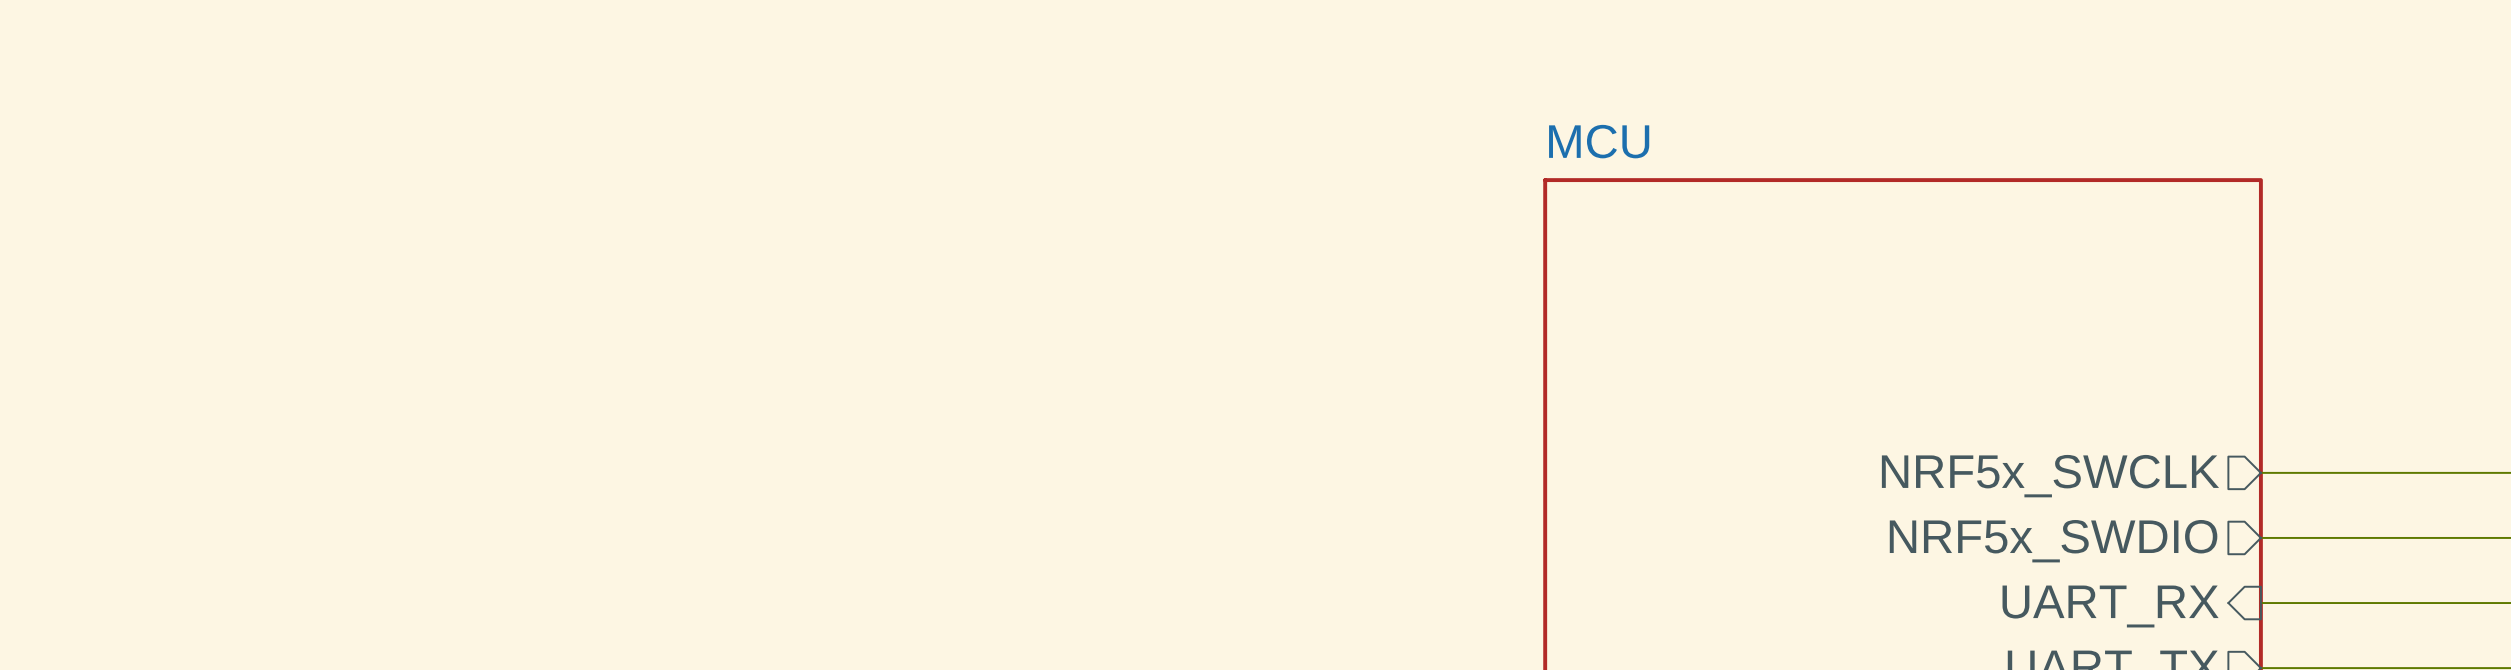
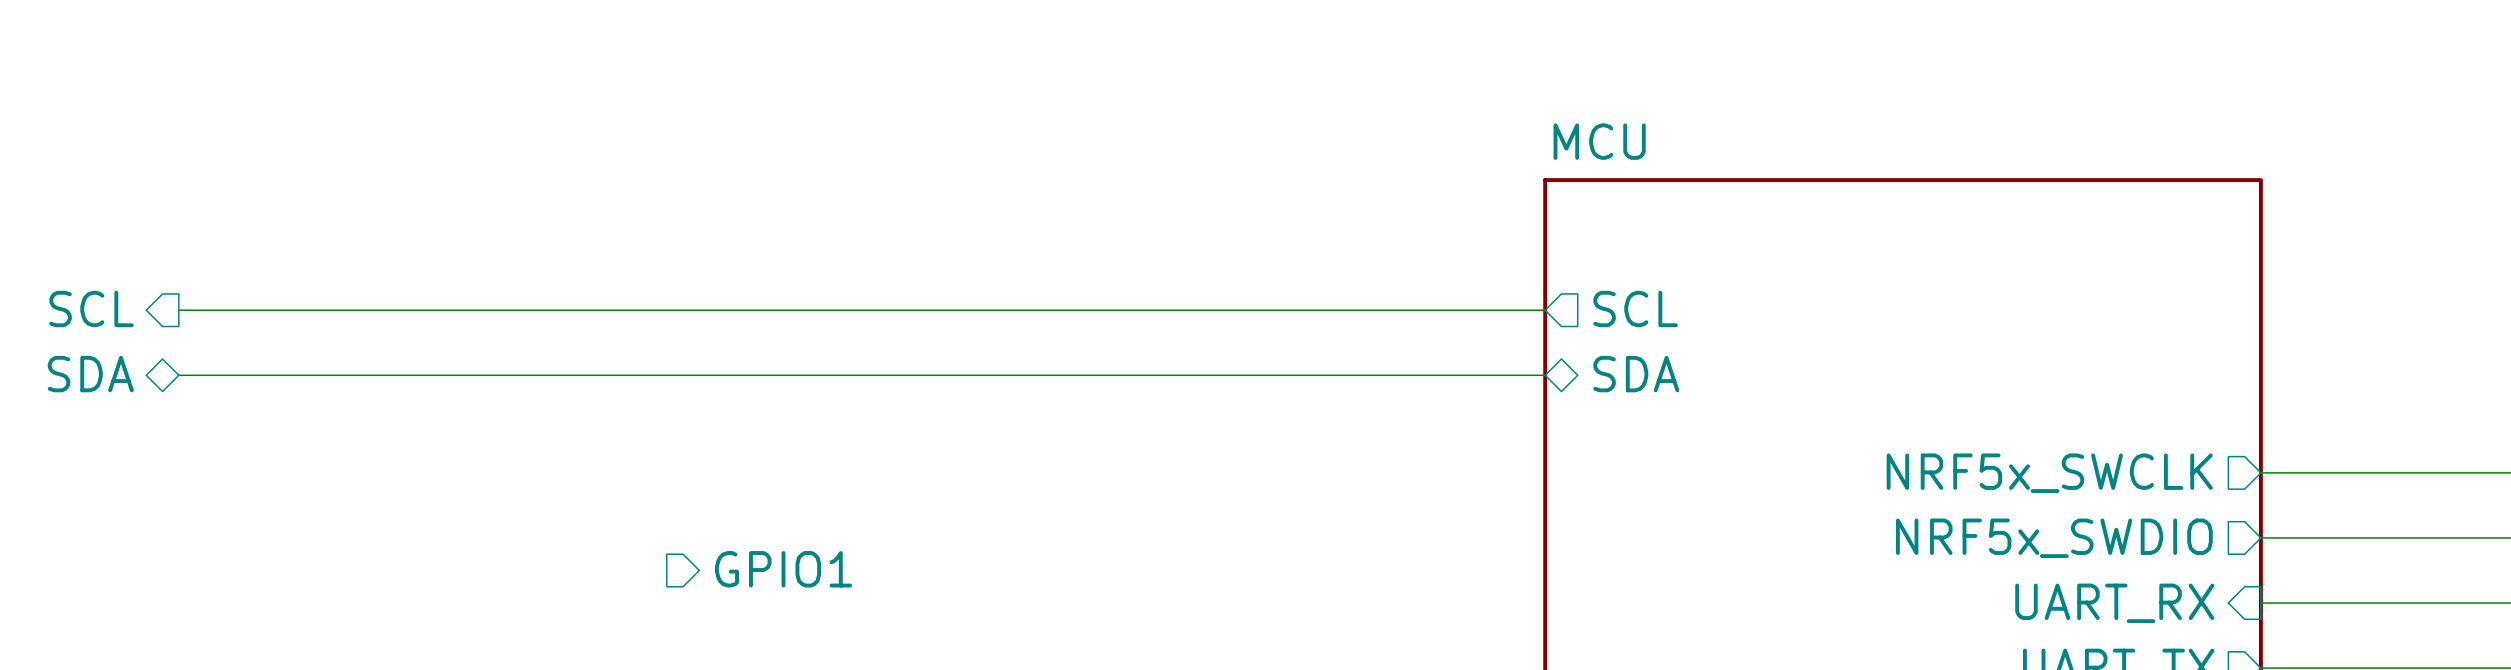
sheet pin: none -> SCL (91, 309)
sheet pin: none -> SCL (1635, 309)
wire: none -> (178, 310) (1545, 310)
sheet pin: none -> SDA (90, 374)
sheet pin: none -> SDA (1636, 374)
wire: none -> (178, 375) (1545, 375)
sheet pin: none -> GPIO1 (783, 569)

